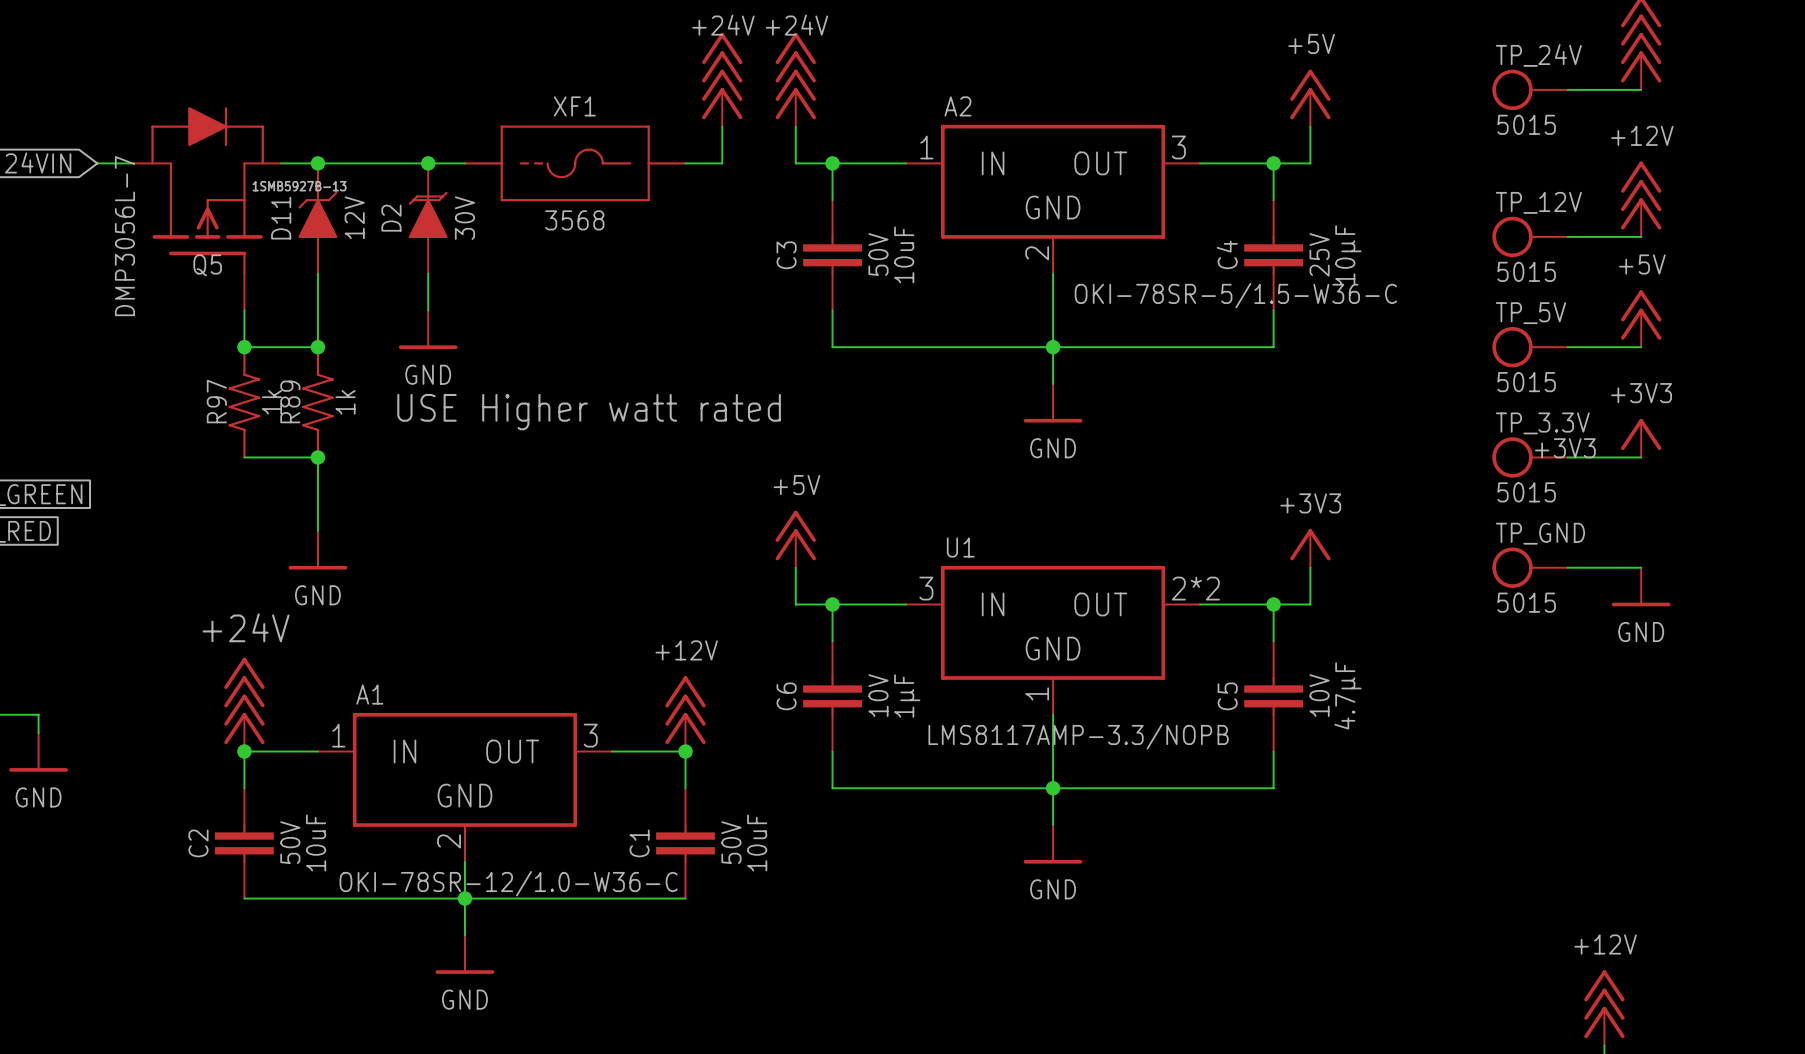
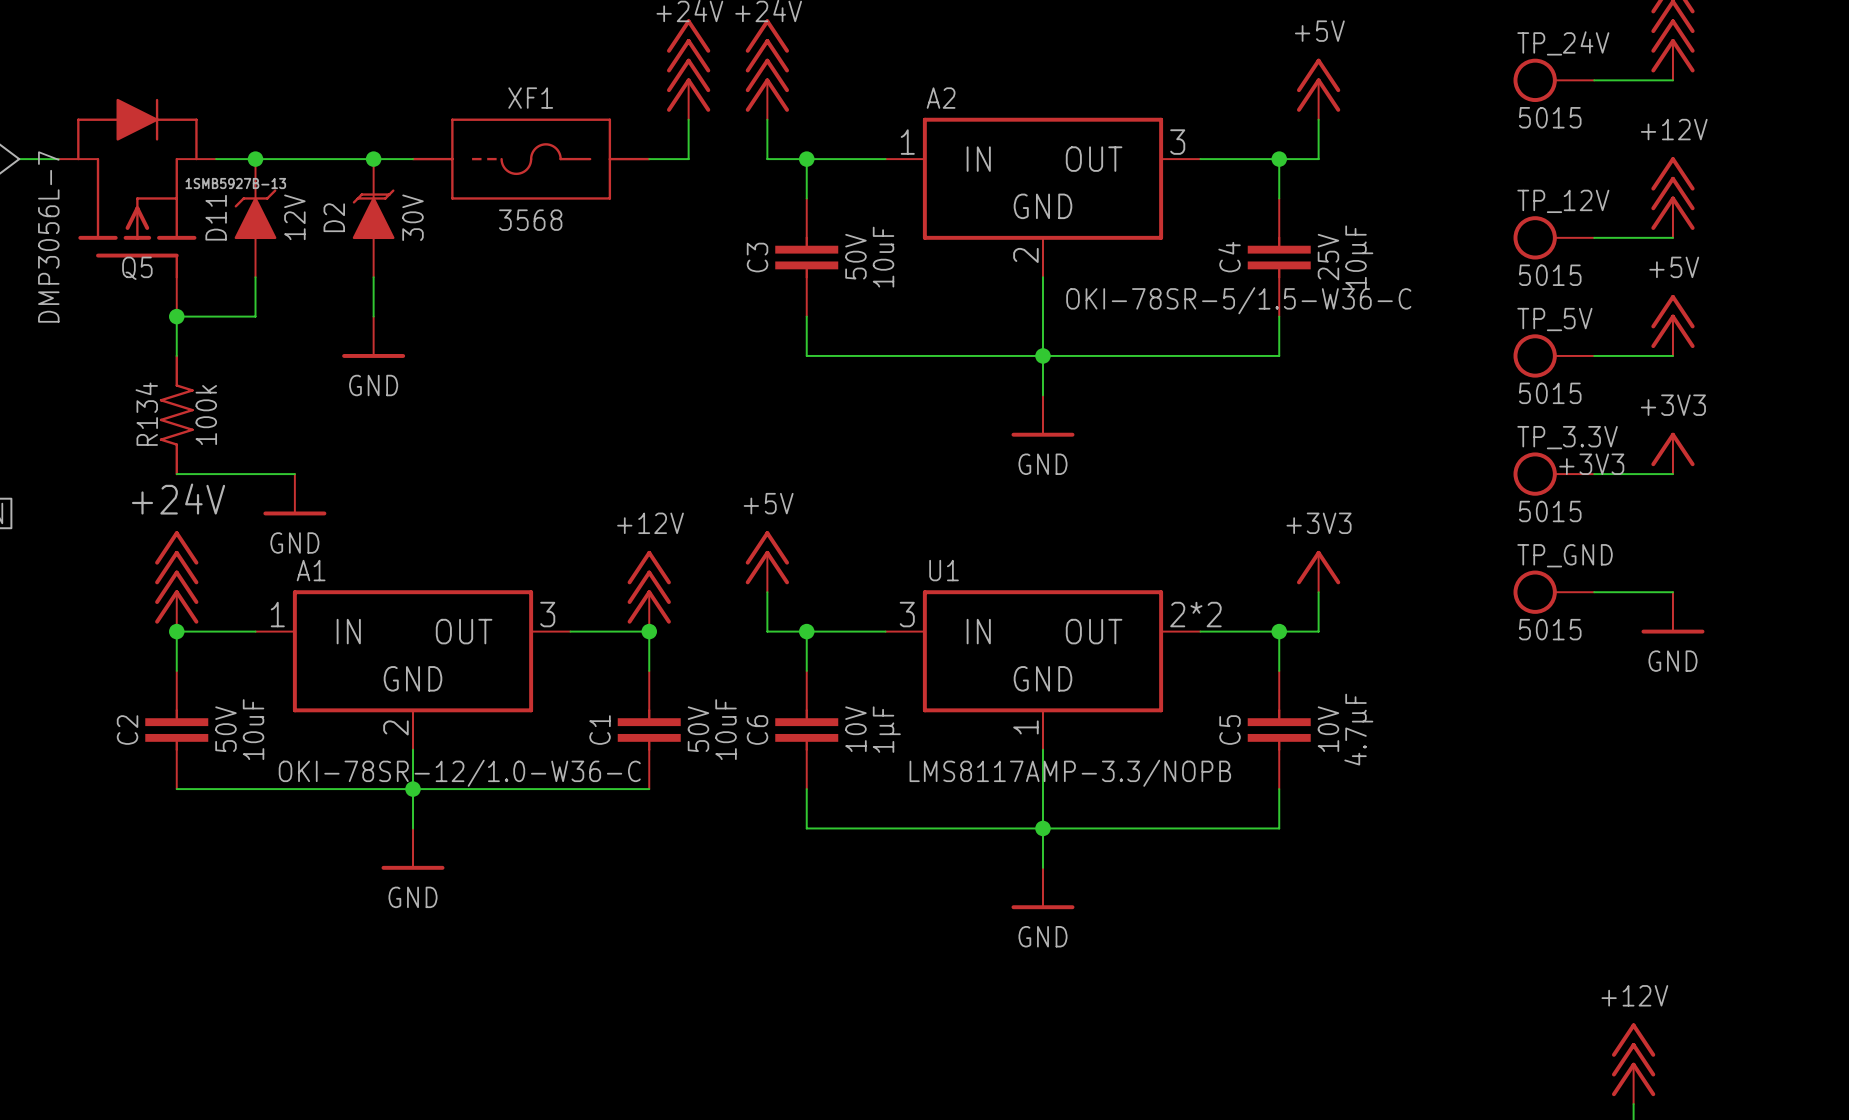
wire: (317, 310) (317, 347) (244, 347) -> (255, 316) (176, 316)
junction position: (244, 347) -> (176, 316)
junction: (317, 347) -> none
R97 name: R97 (216, 401) -> R134 (146, 414)
R97 text: 1k (271, 402) -> 100k (206, 415)
R89: (317, 402) -> none
text: USE Higher watt rated (589, 412) -> none
wire: (317, 457) (317, 530) -> (255, 474) (294, 474)
junction: (317, 457) -> none
power symbol position: GND (317, 550) -> GND (294, 494)
junction: none -> (176, 631)
wire: none -> (255, 631) (176, 631) (176, 670)
wire: none -> (570, 631) (649, 631) (649, 670)
junction: none -> (649, 631)
power symbol position: +24V (244, 704) -> +24V (176, 581)
power symbol position: +12V (685, 713) -> +12V (649, 591)
wire: (244, 751) (244, 788) -> none
junction: (244, 751) -> none
wire: none -> (255, 789) (570, 789)
junction: none -> (413, 789)
wire: (685, 751) (685, 788) -> none
junction: (685, 751) -> none
A1 position: (464, 787) -> (413, 669)
C2 position: (244, 843) -> (176, 730)
C1 position: (685, 843) -> (649, 730)
wire: (464, 861) (464, 935) -> (413, 749) (413, 828)
wire: (244, 898) (685, 898) -> none
junction: (464, 898) -> none
power symbol position: GND (464, 954) -> GND (413, 849)

